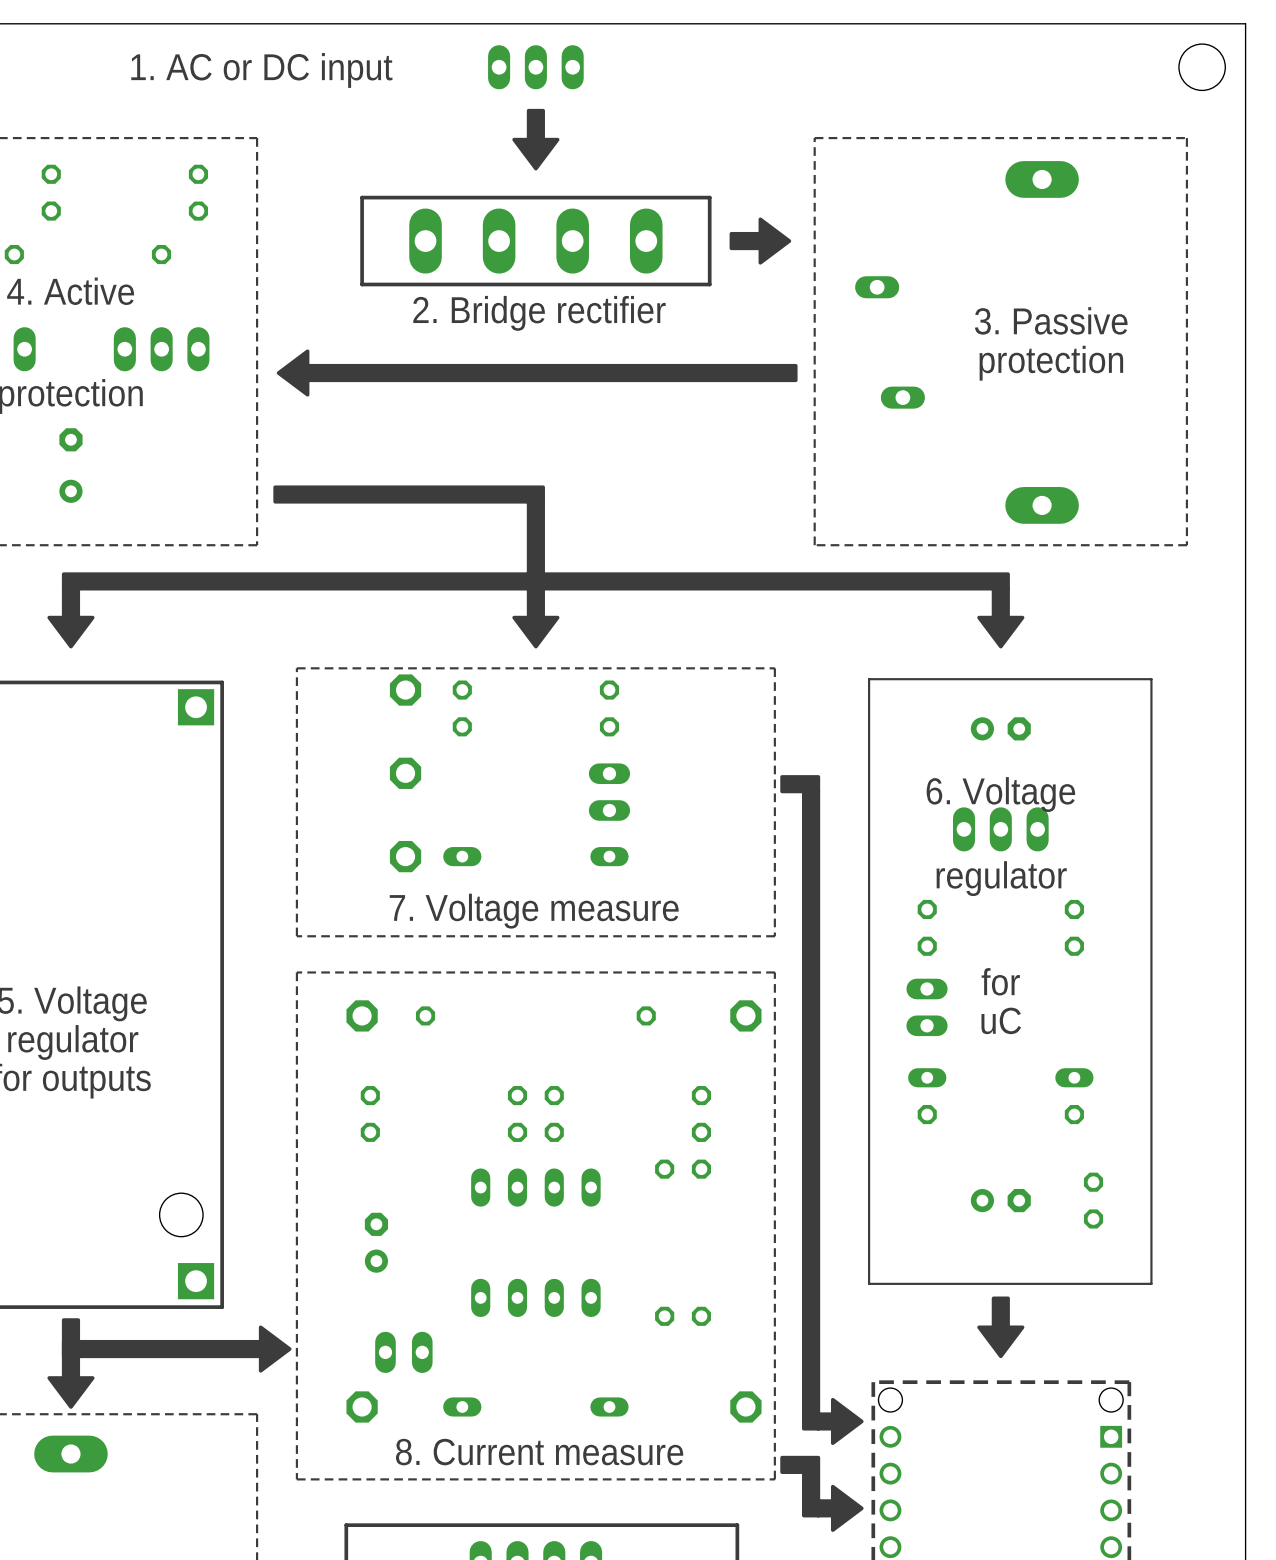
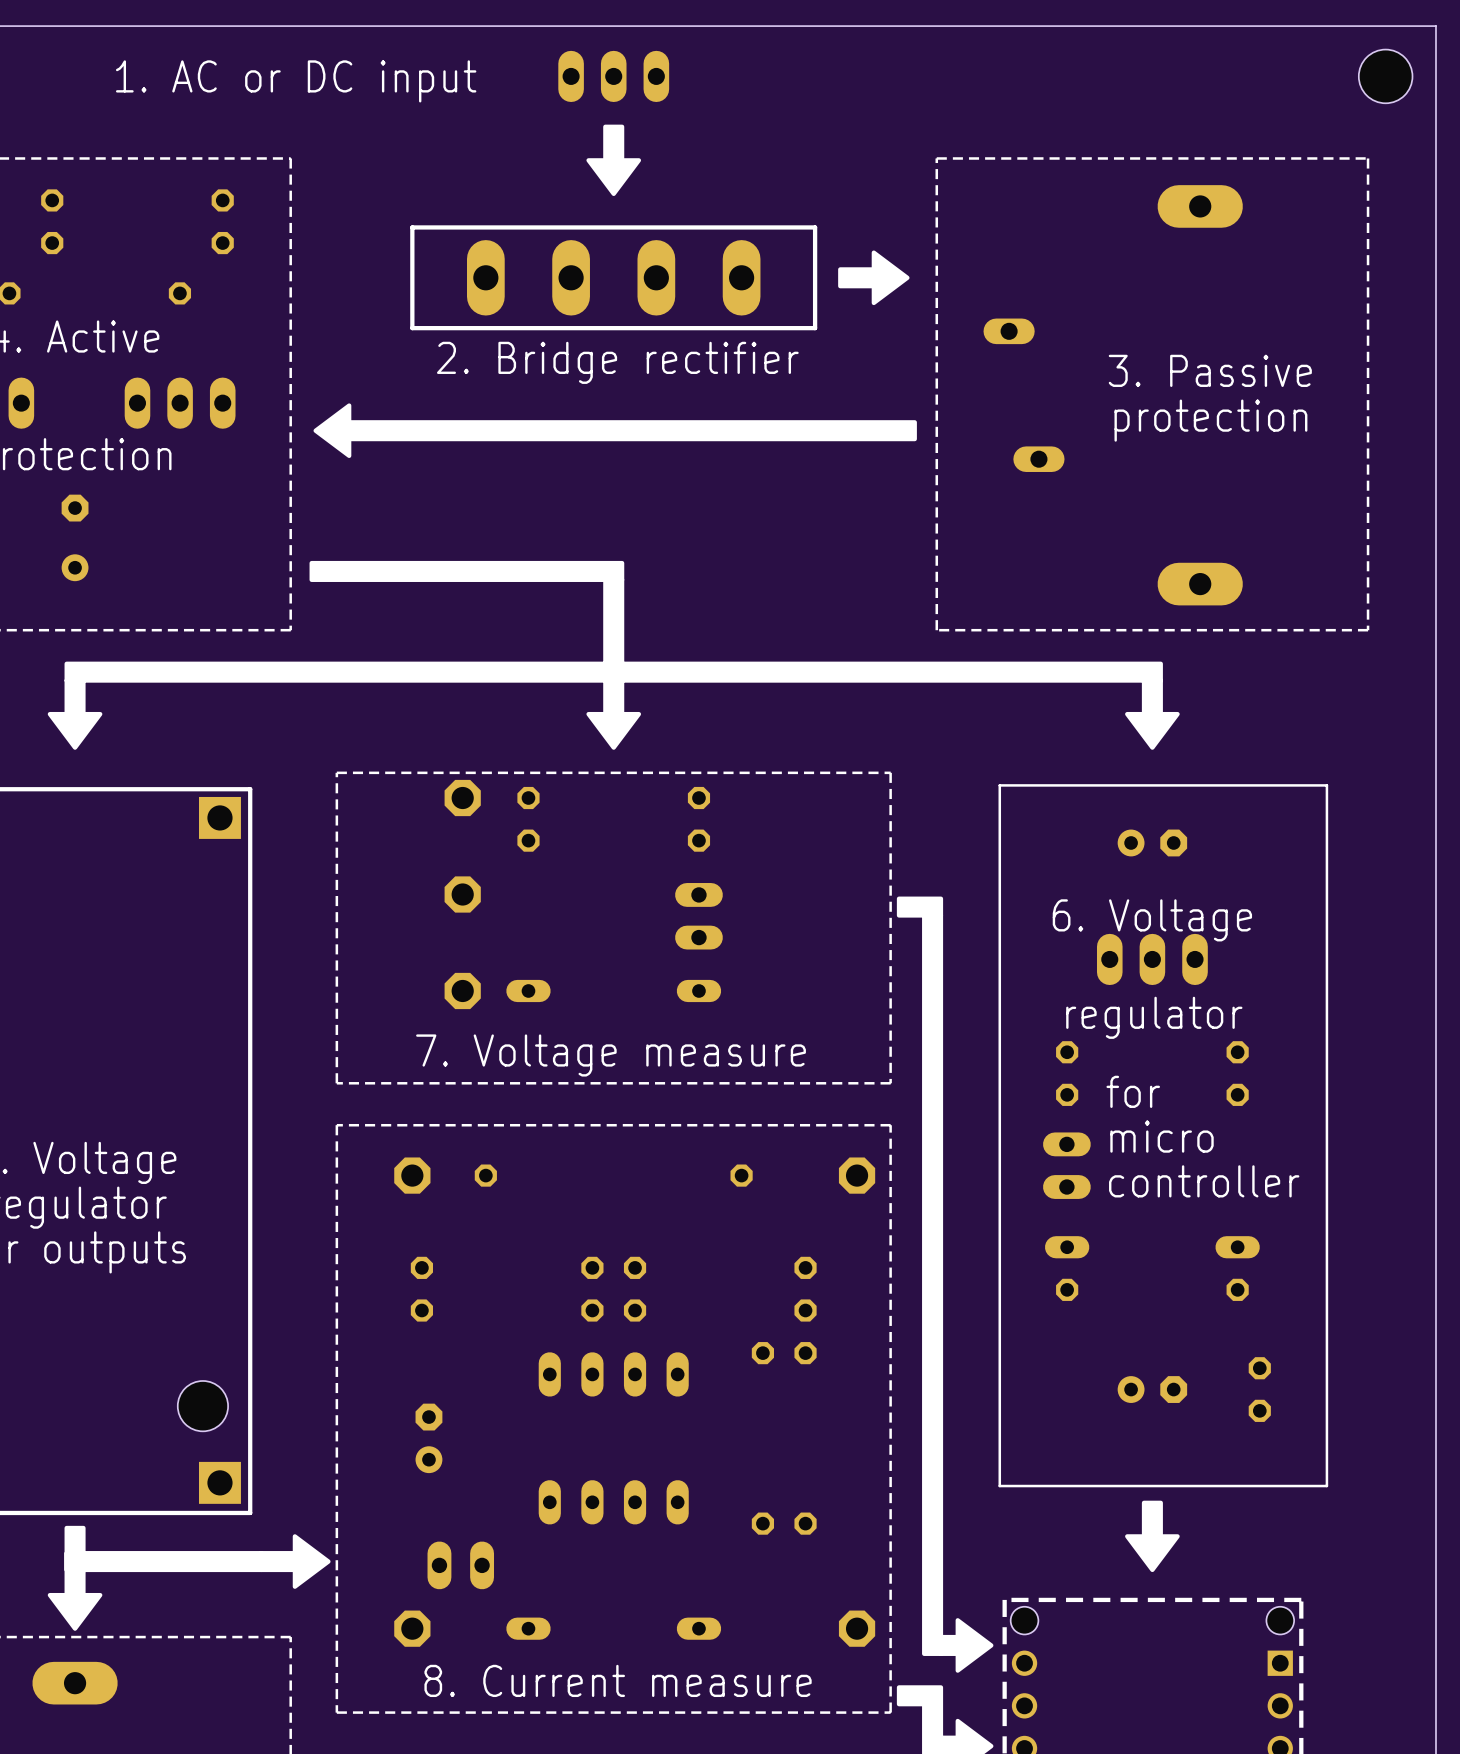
text position: for (1000, 981) -> for (1133, 1091)
text: none -> micro (1162, 1136)
text: uC (1001, 1020) -> none
text: none -> controller (1204, 1181)

